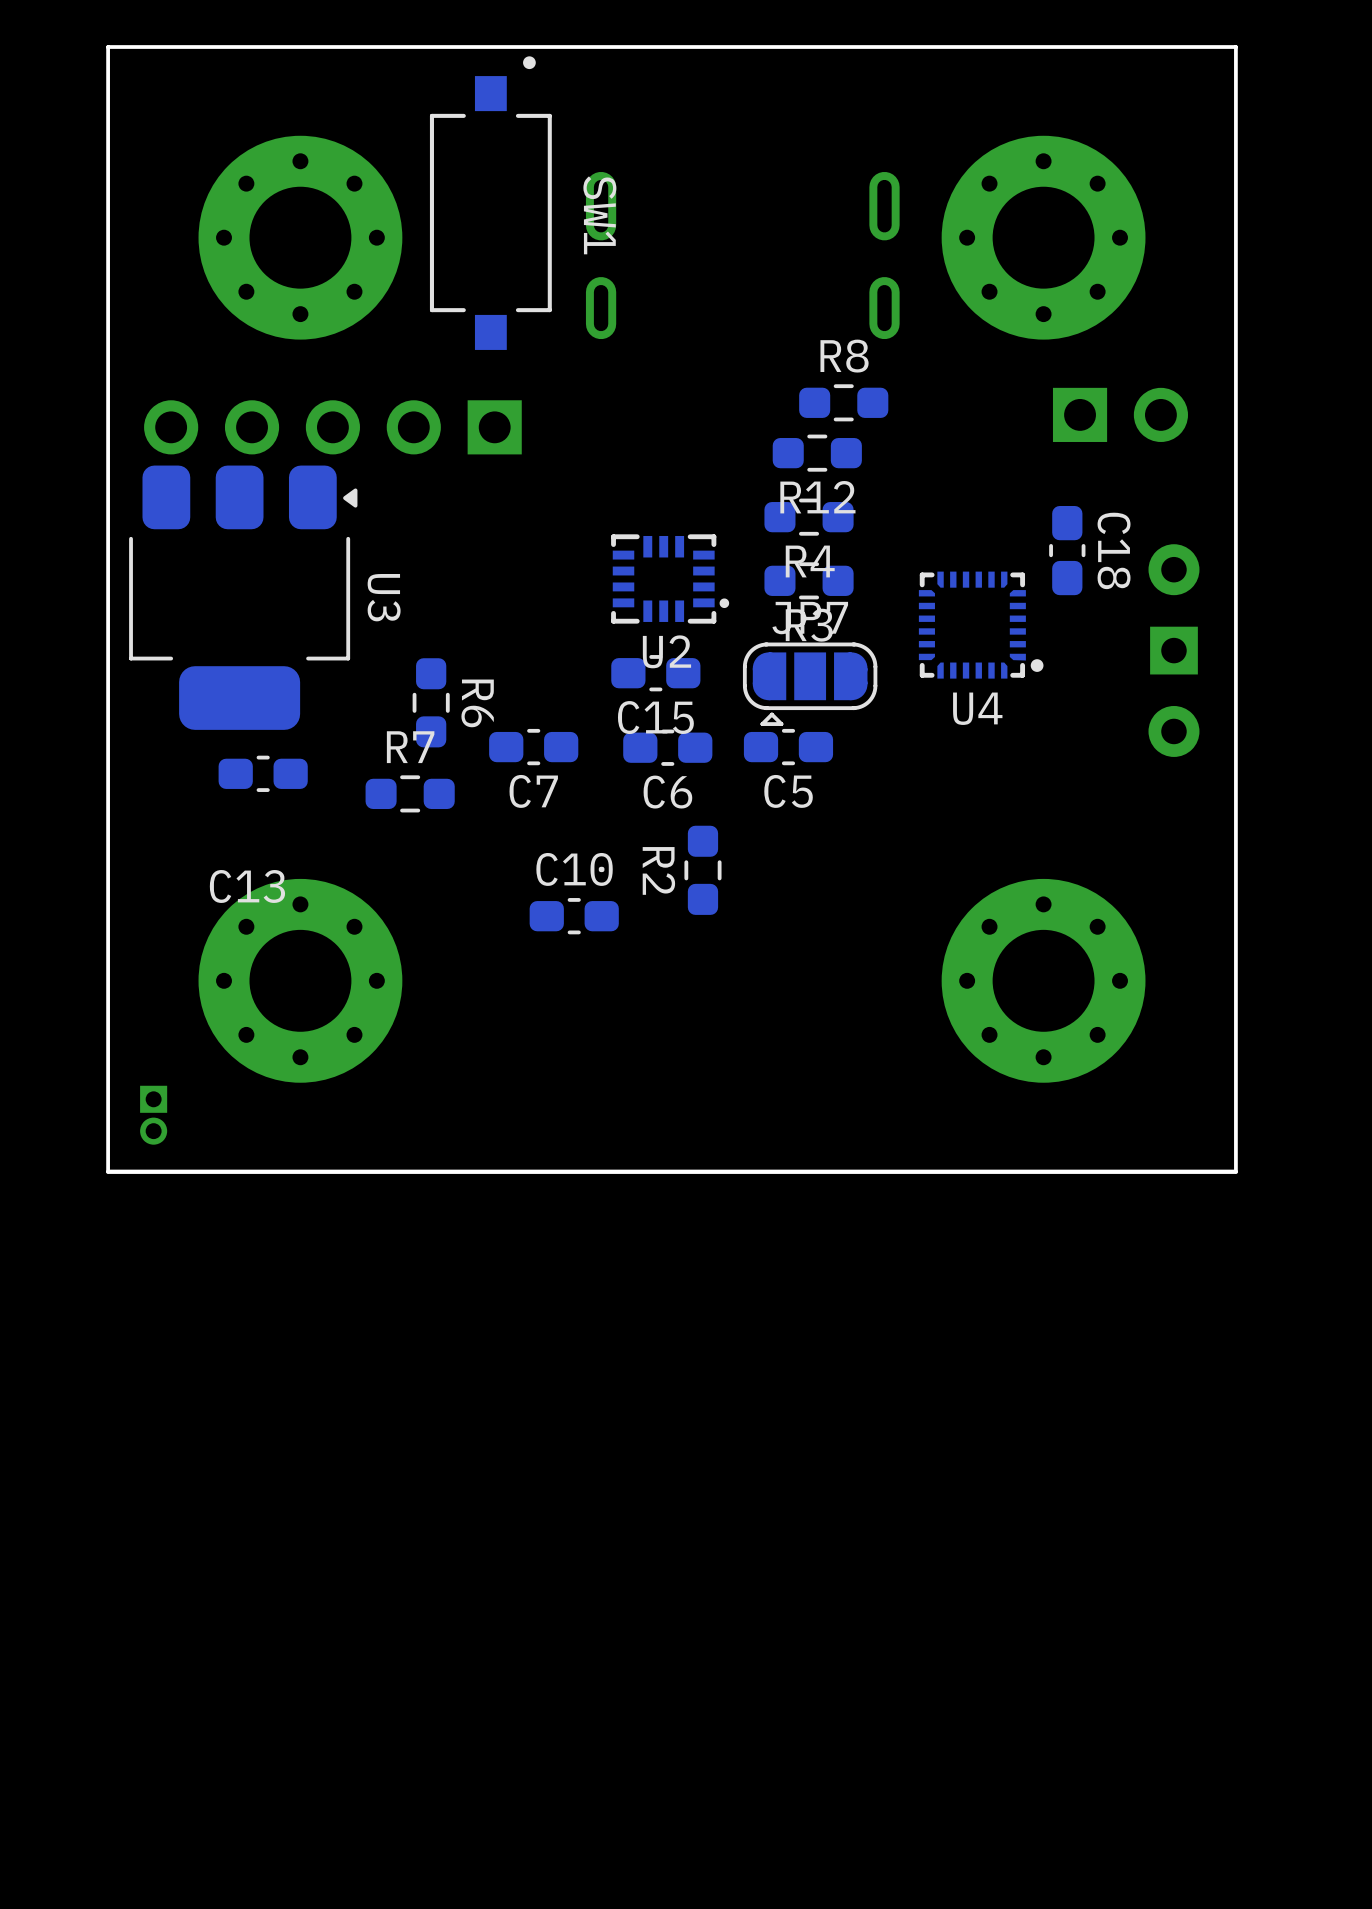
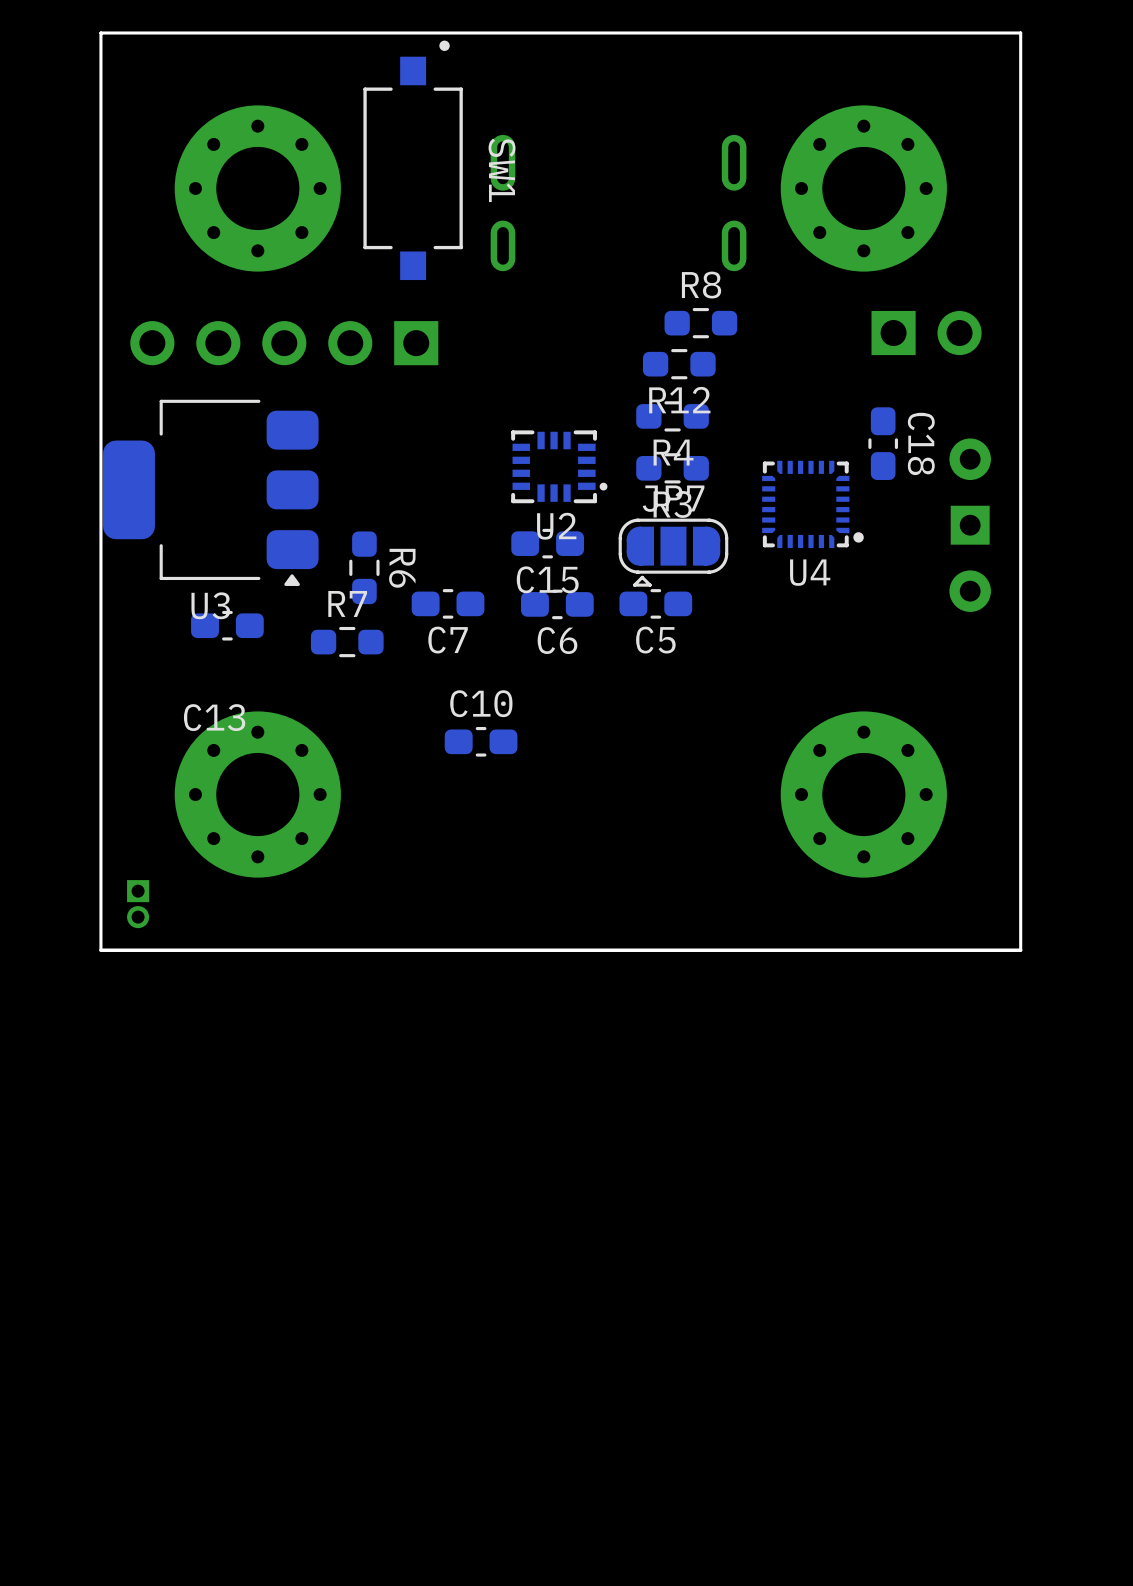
U3 rotation: 0° (243, 597) -> 90° clockwise (210, 492)
R2: (702, 870) -> none

